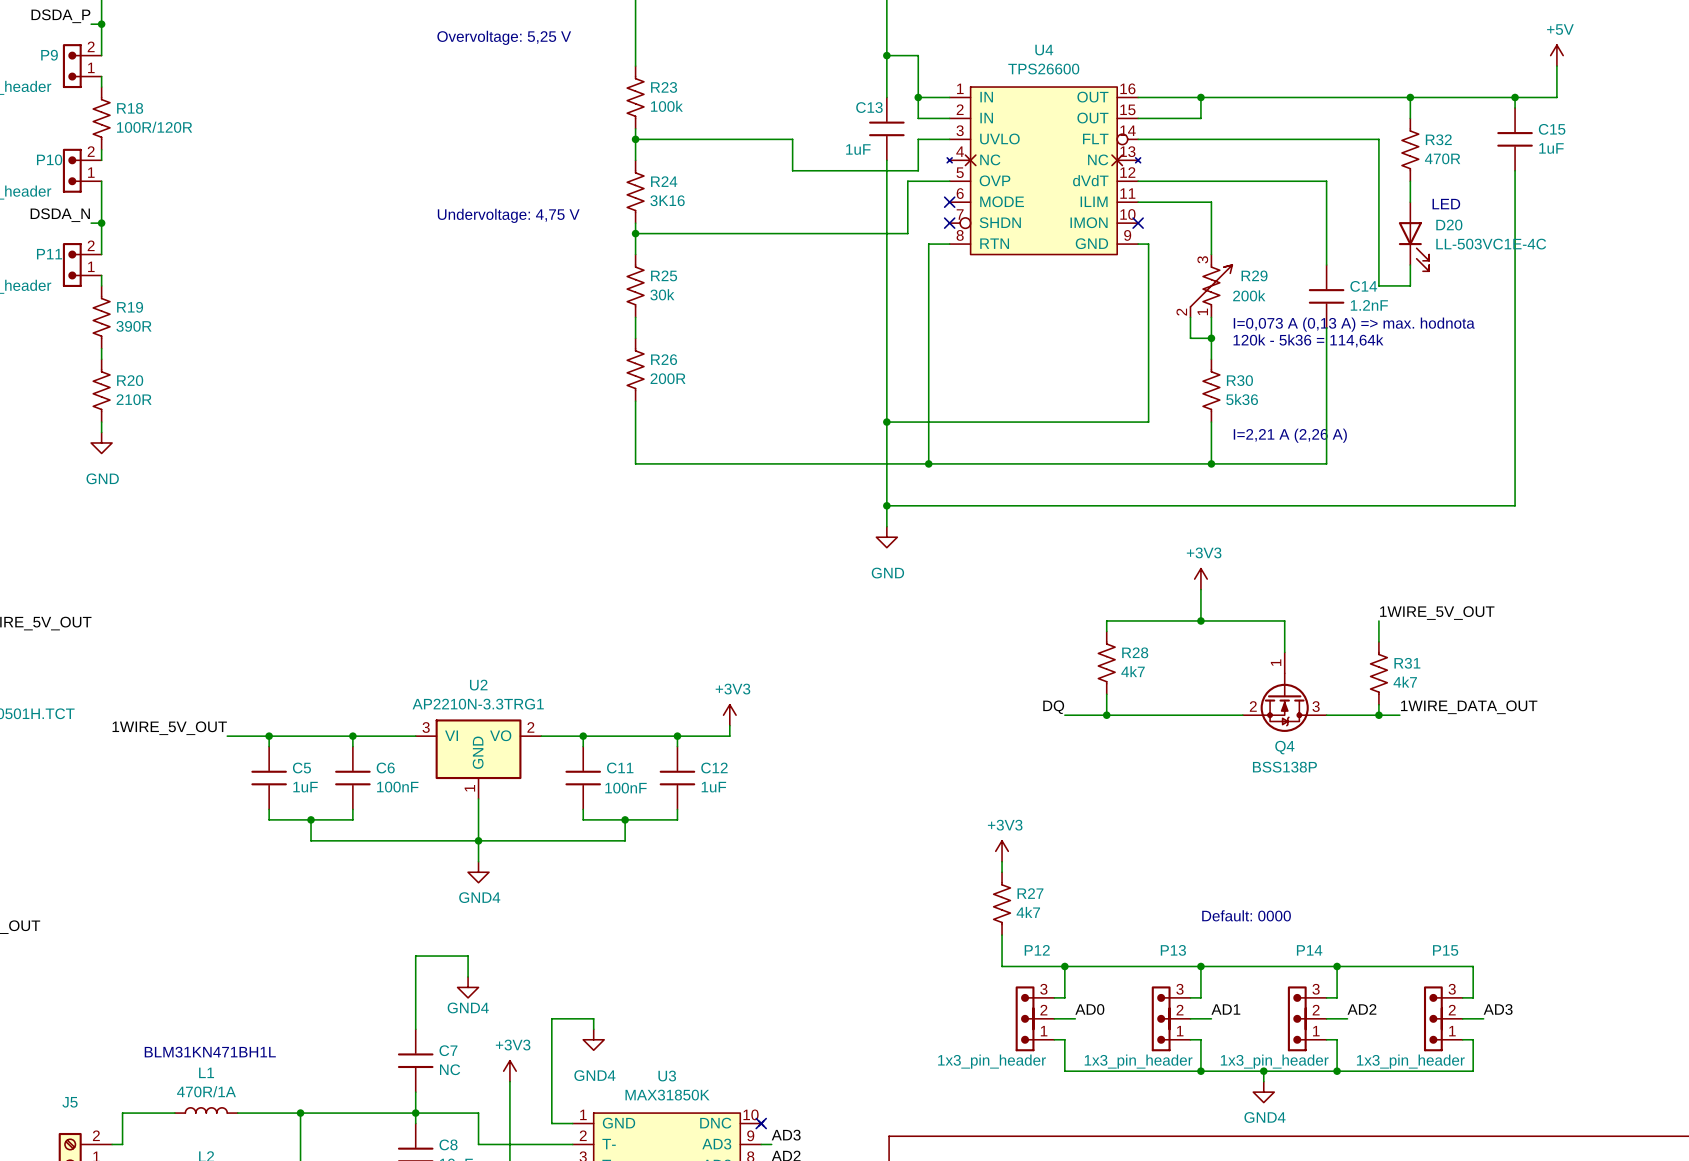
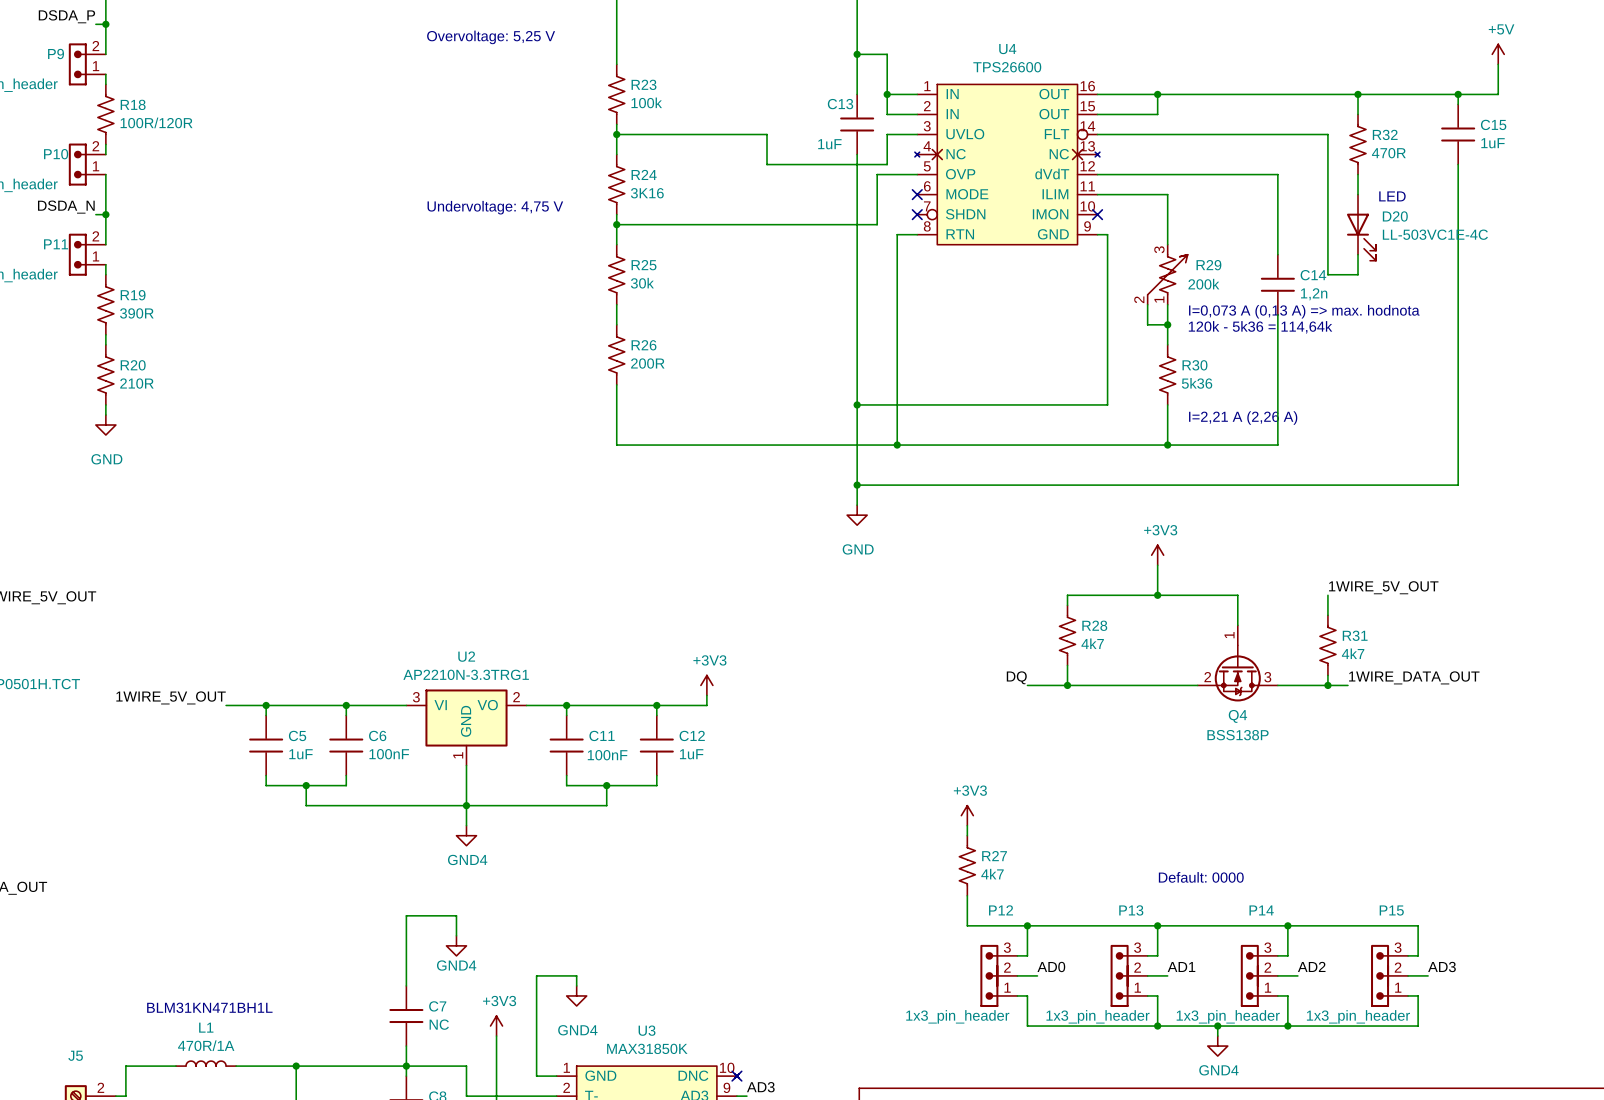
C14 value: 1.2nF (1369, 305) -> 1,2n (1314, 294)

